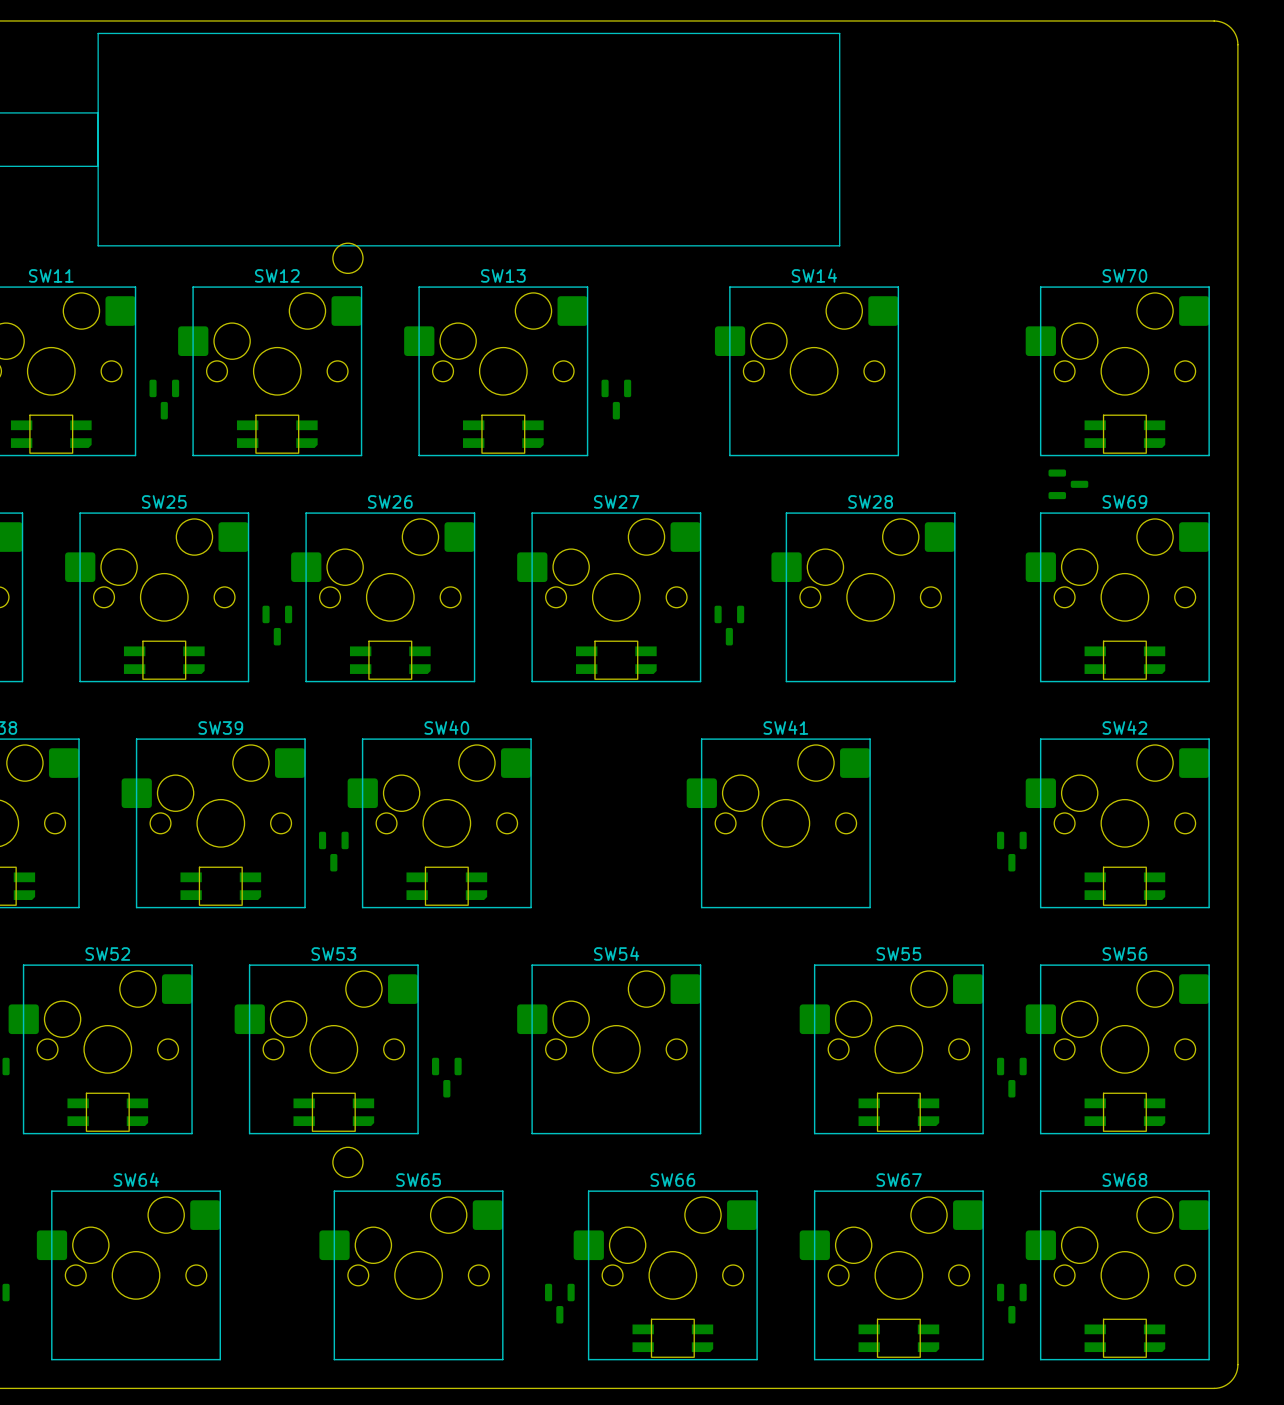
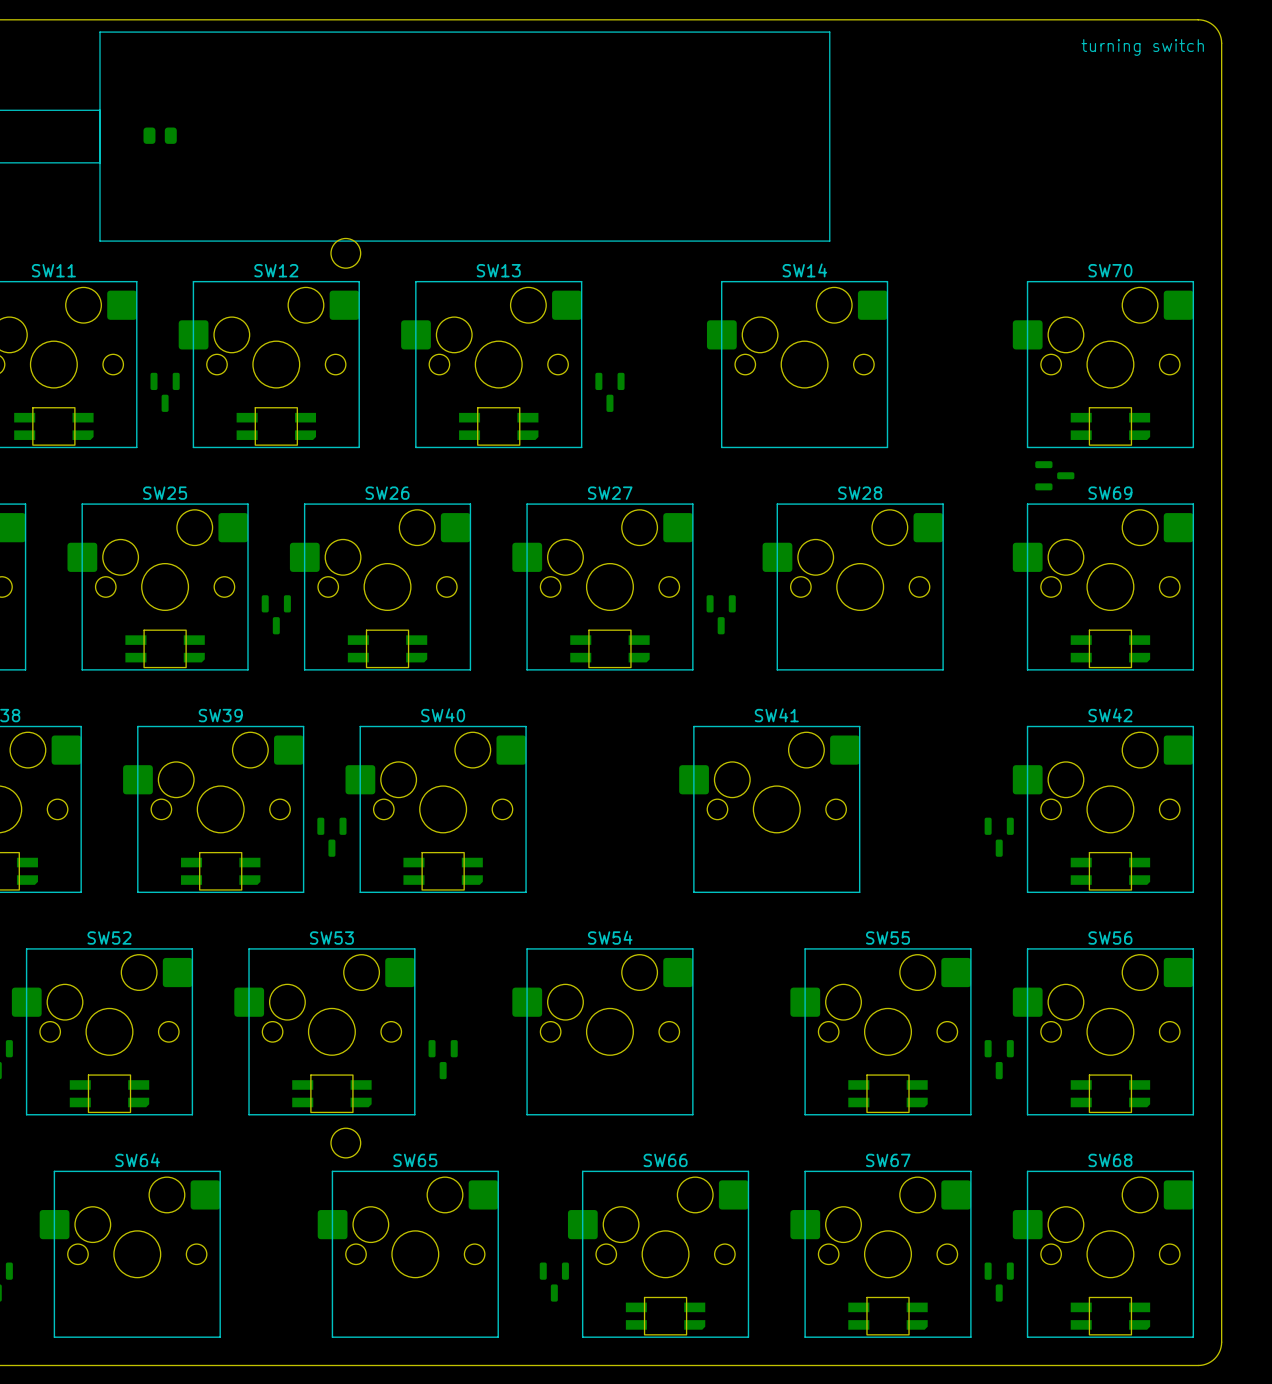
text: none -> turning switch (1142, 47)
part: none -> (160, 135)

